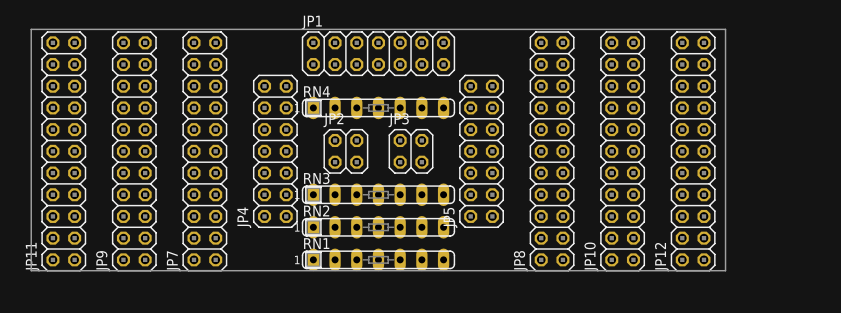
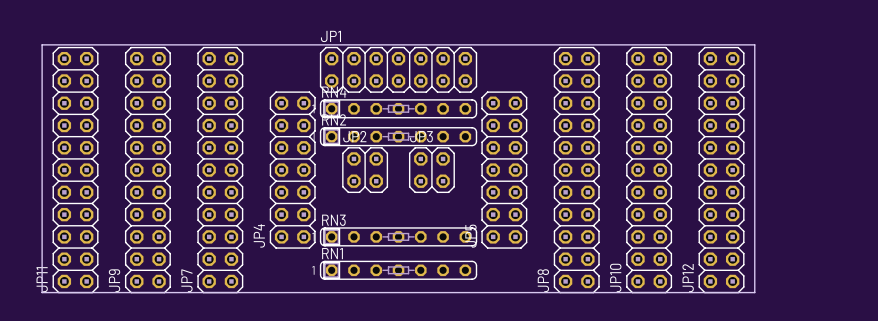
RN4 footprint: [301, 96, 456, 120] -> [319, 99, 478, 119]
RN3 footprint: [301, 183, 456, 207] -> [319, 227, 478, 247]
RN2 footprint: [301, 216, 456, 239] -> [319, 127, 478, 147]
RN1 footprint: [301, 248, 456, 272] -> [319, 260, 478, 280]

